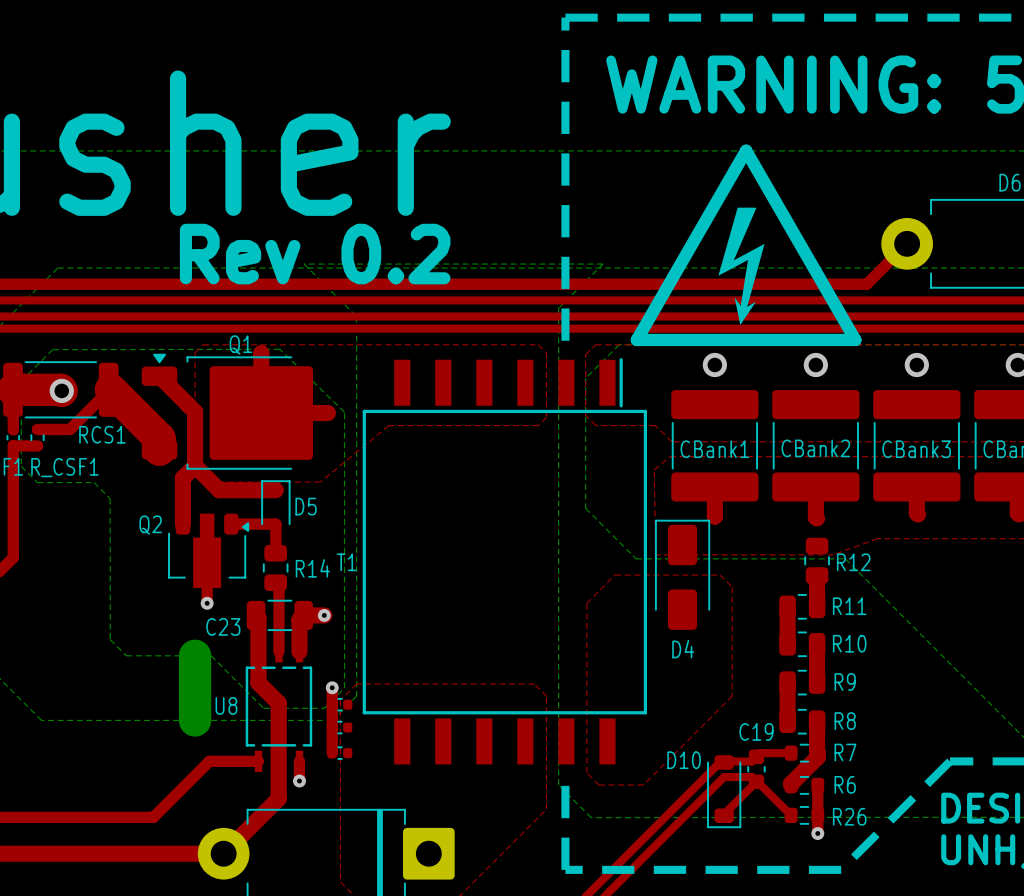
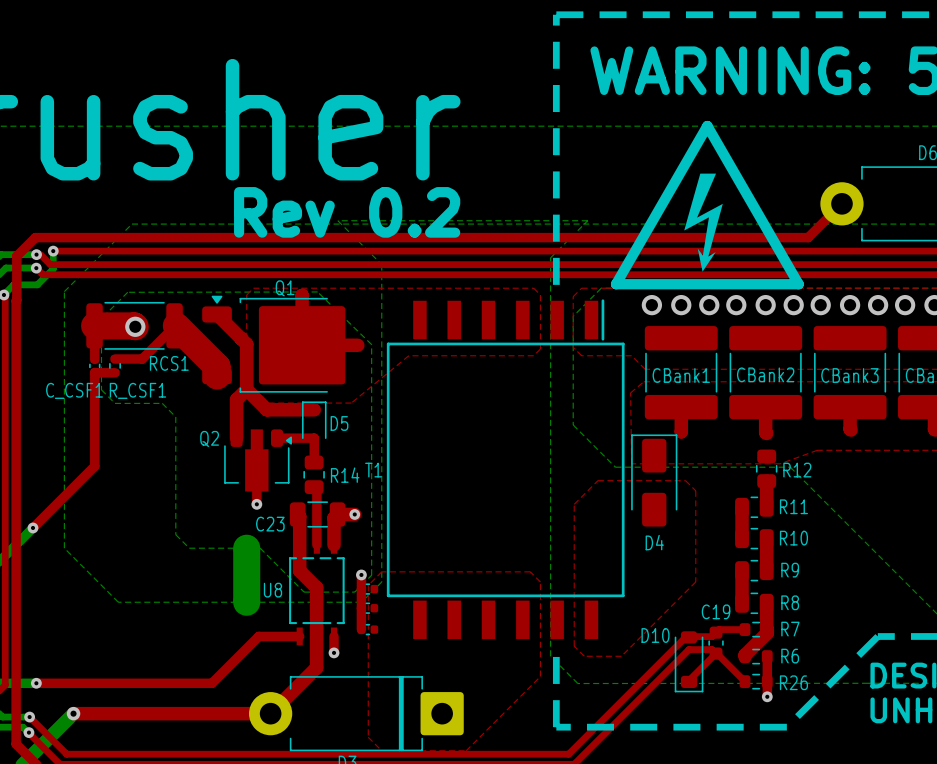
via: none -> (651, 305)
via: none -> (709, 305)
via: none -> (736, 305)
via: none -> (793, 305)
via: none -> (820, 305)
via: none -> (878, 305)
via: none -> (905, 305)

